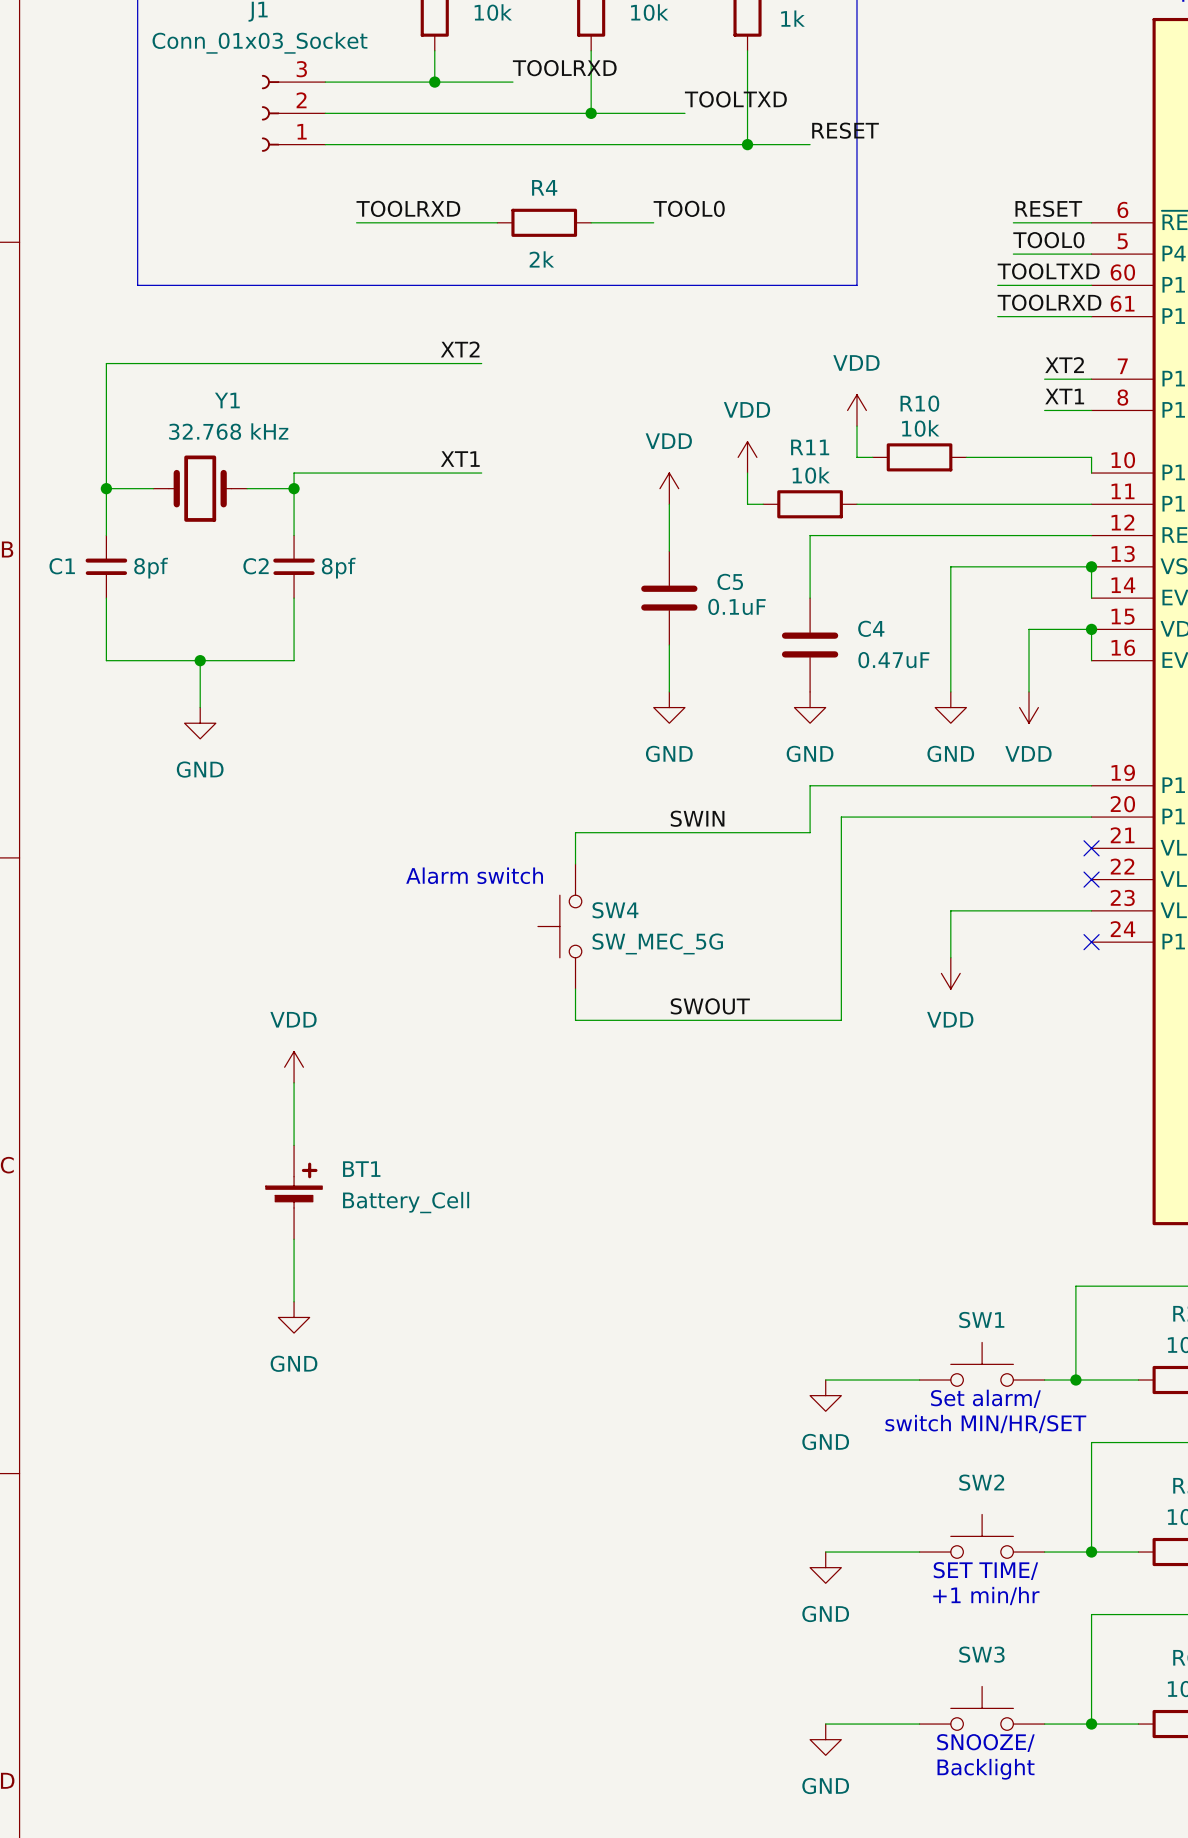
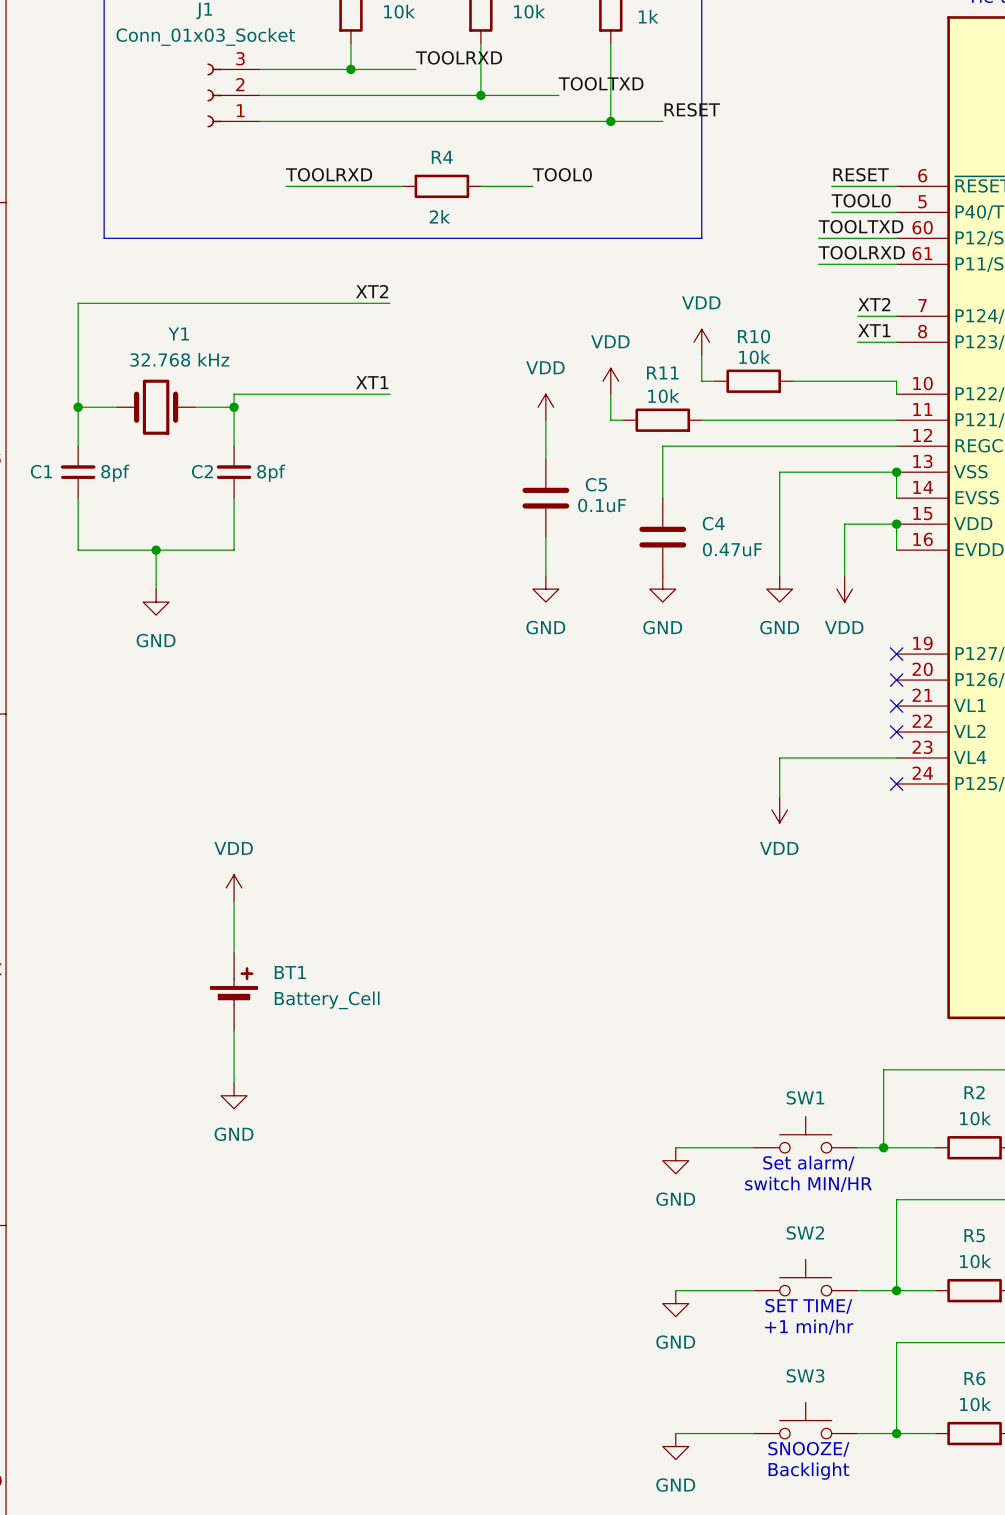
wire: (1091, 785) (810, 785) (810, 832) (575, 832) (575, 863) -> none
no-connect mark: none -> (896, 654)
wire: (1091, 817) (841, 817) (841, 1020) (575, 1020) (575, 989) -> none
no-connect mark: none -> (896, 680)
label: SWIN (697, 818) -> none
text: Alarm switch (474, 875) -> none
SW4: SW_MEC_5G (559, 926) -> none
label: SWOUT (710, 1006) -> none
text: switch MIN/HR/SET (985, 1423) -> switch MIN/HR (808, 1184)

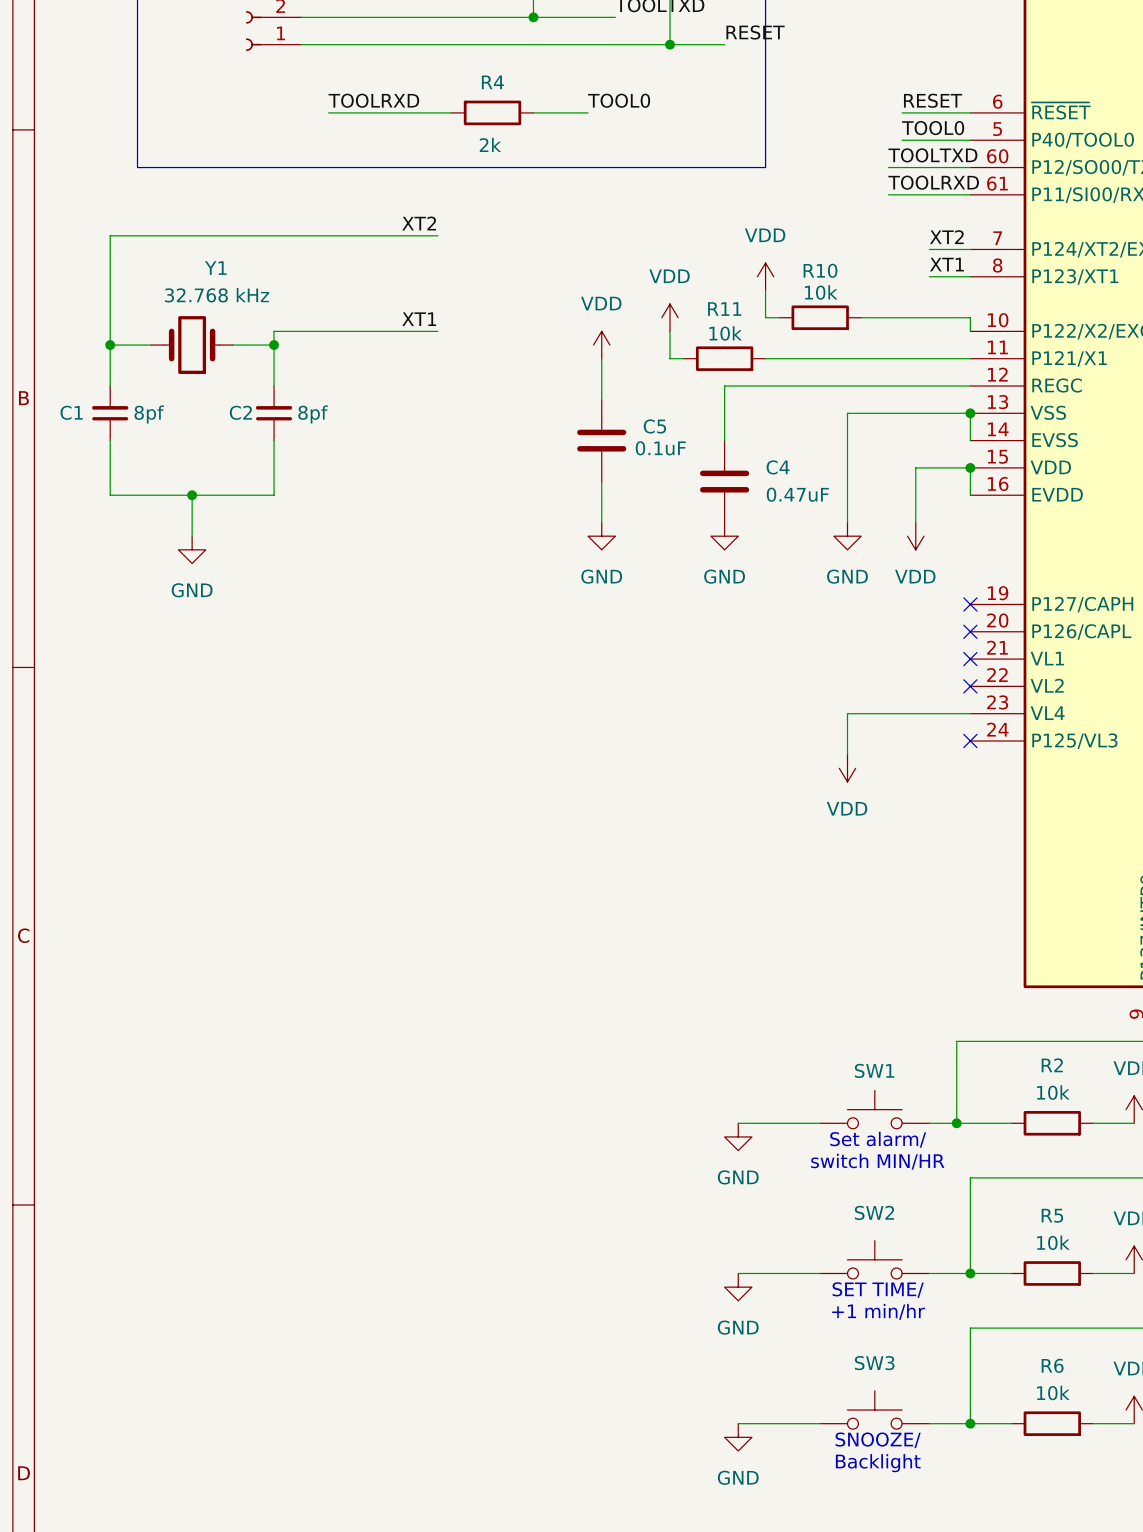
power symbol: VDD (234, 887) -> none
wire: (234, 900) (234, 952) -> none
BT1: Battery_Cell (234, 991) -> none
wire: (234, 1030) (234, 1082) -> none
power symbol: GND (234, 1095) -> none

